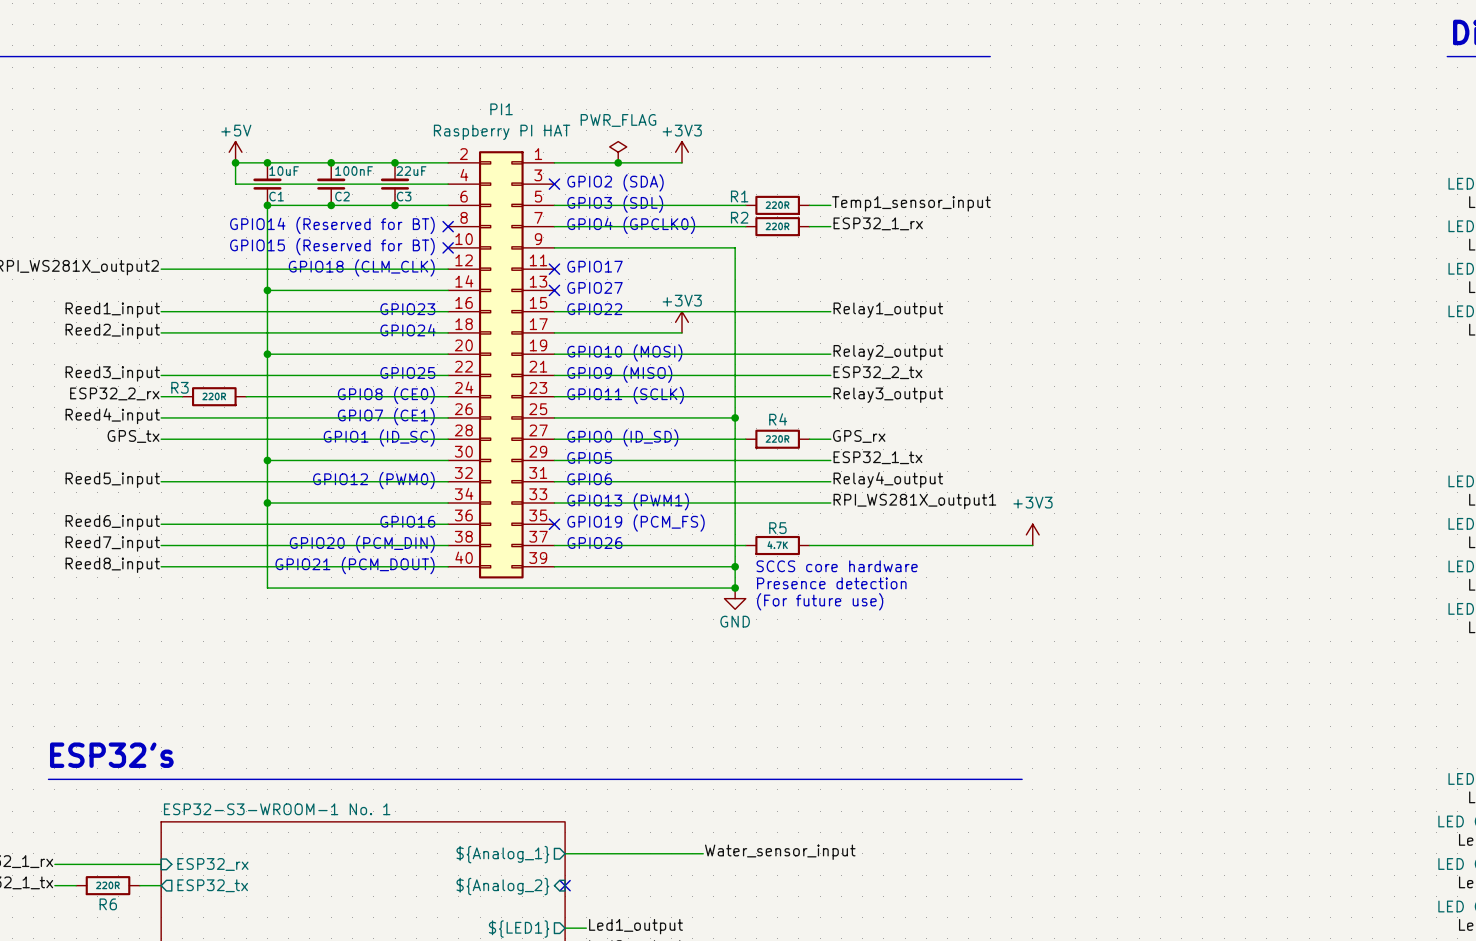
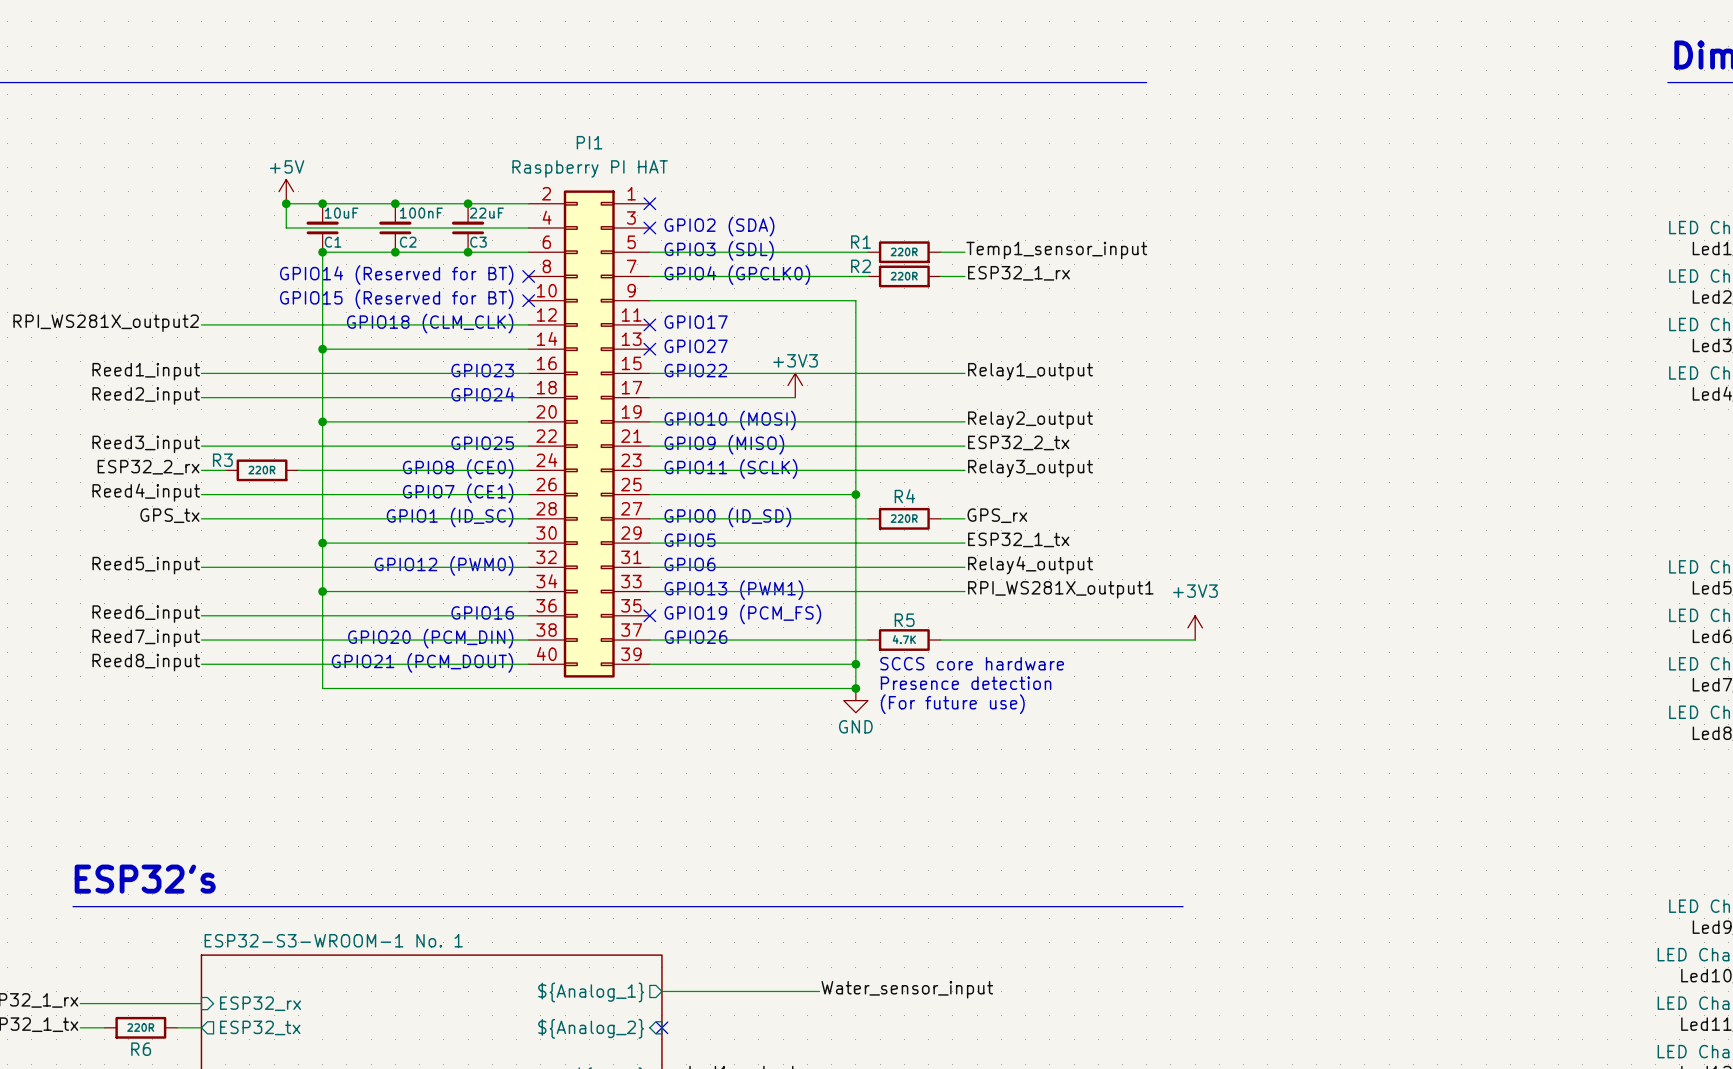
power symbol: PWR_FLAG (618, 152) -> none
power symbol: +3V3 (681, 152) -> none
wire: (554, 162) (681, 162) -> none
no-connect mark: none -> (649, 203)
junction: (618, 162) -> none

